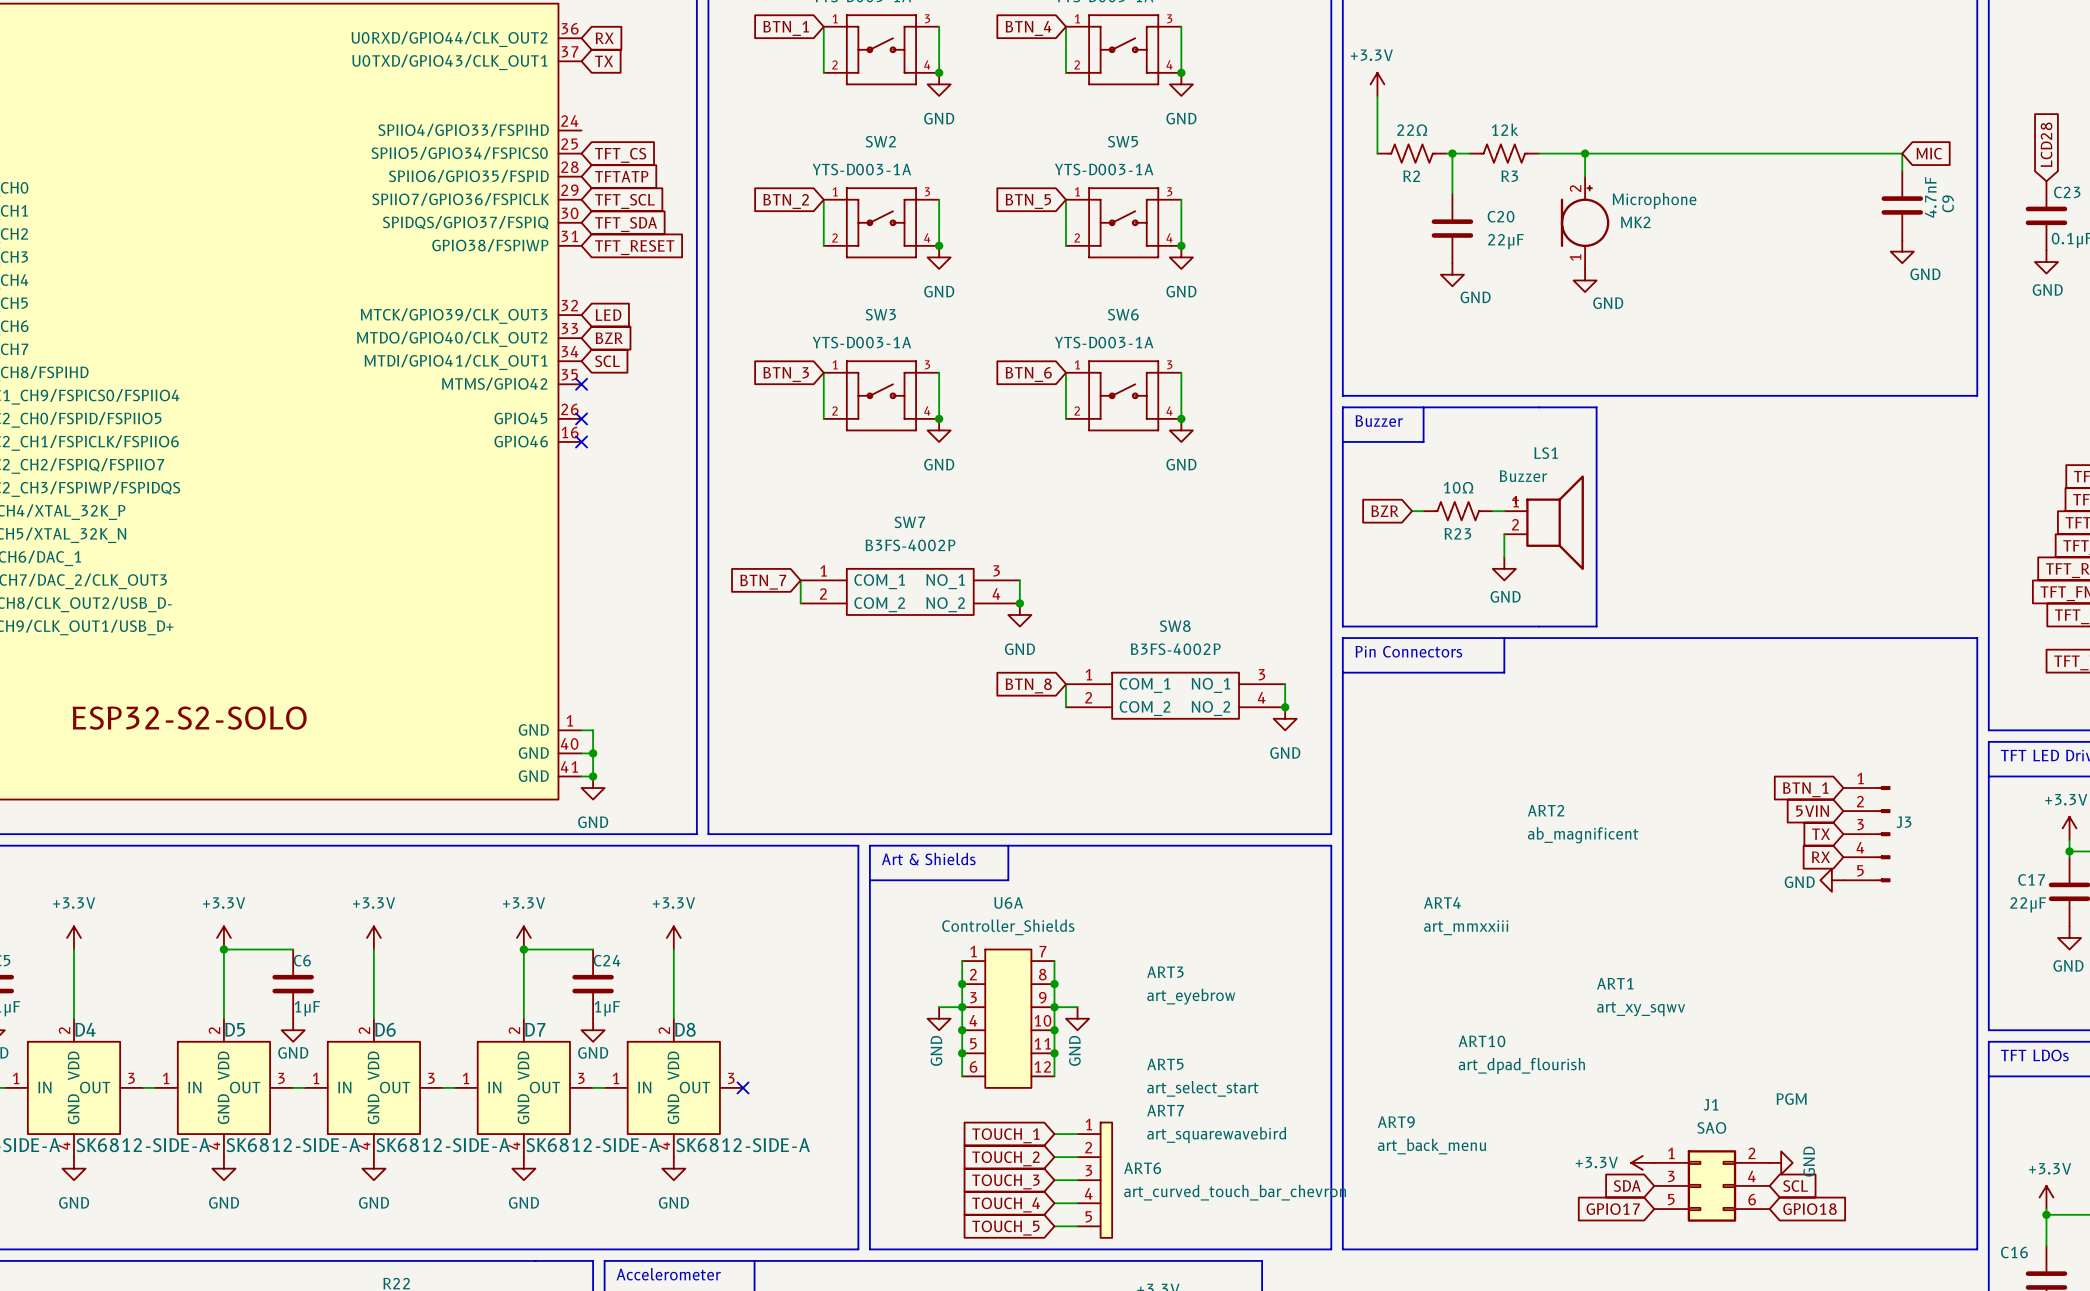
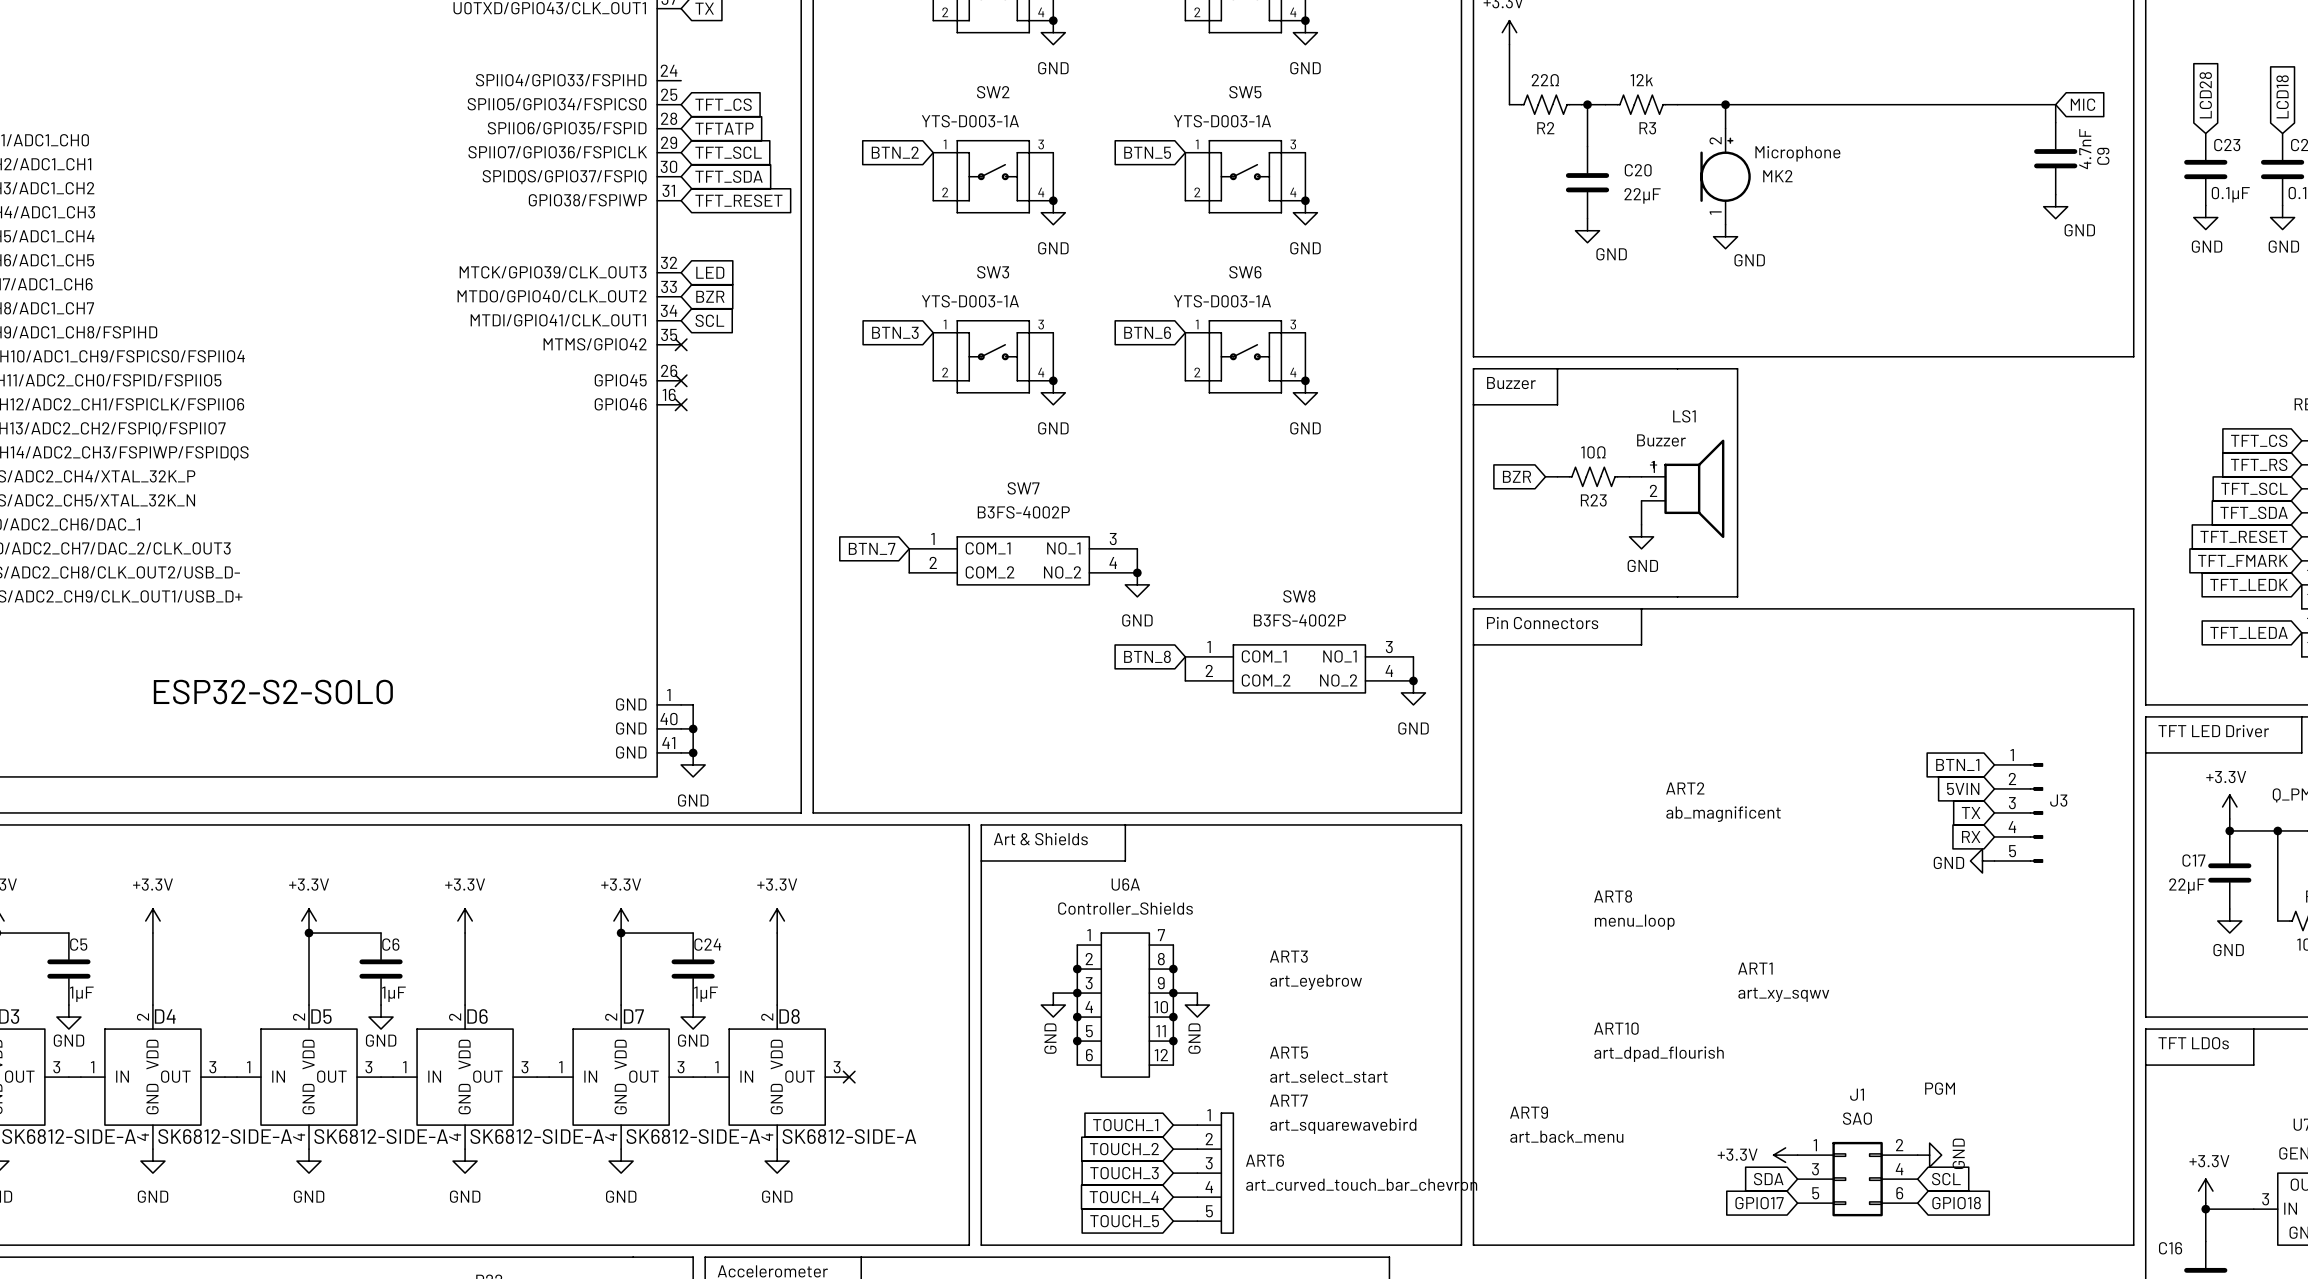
ART4: art_mmxxiii (1466, 916) -> none
ART8: none -> menu_loop (1634, 910)

